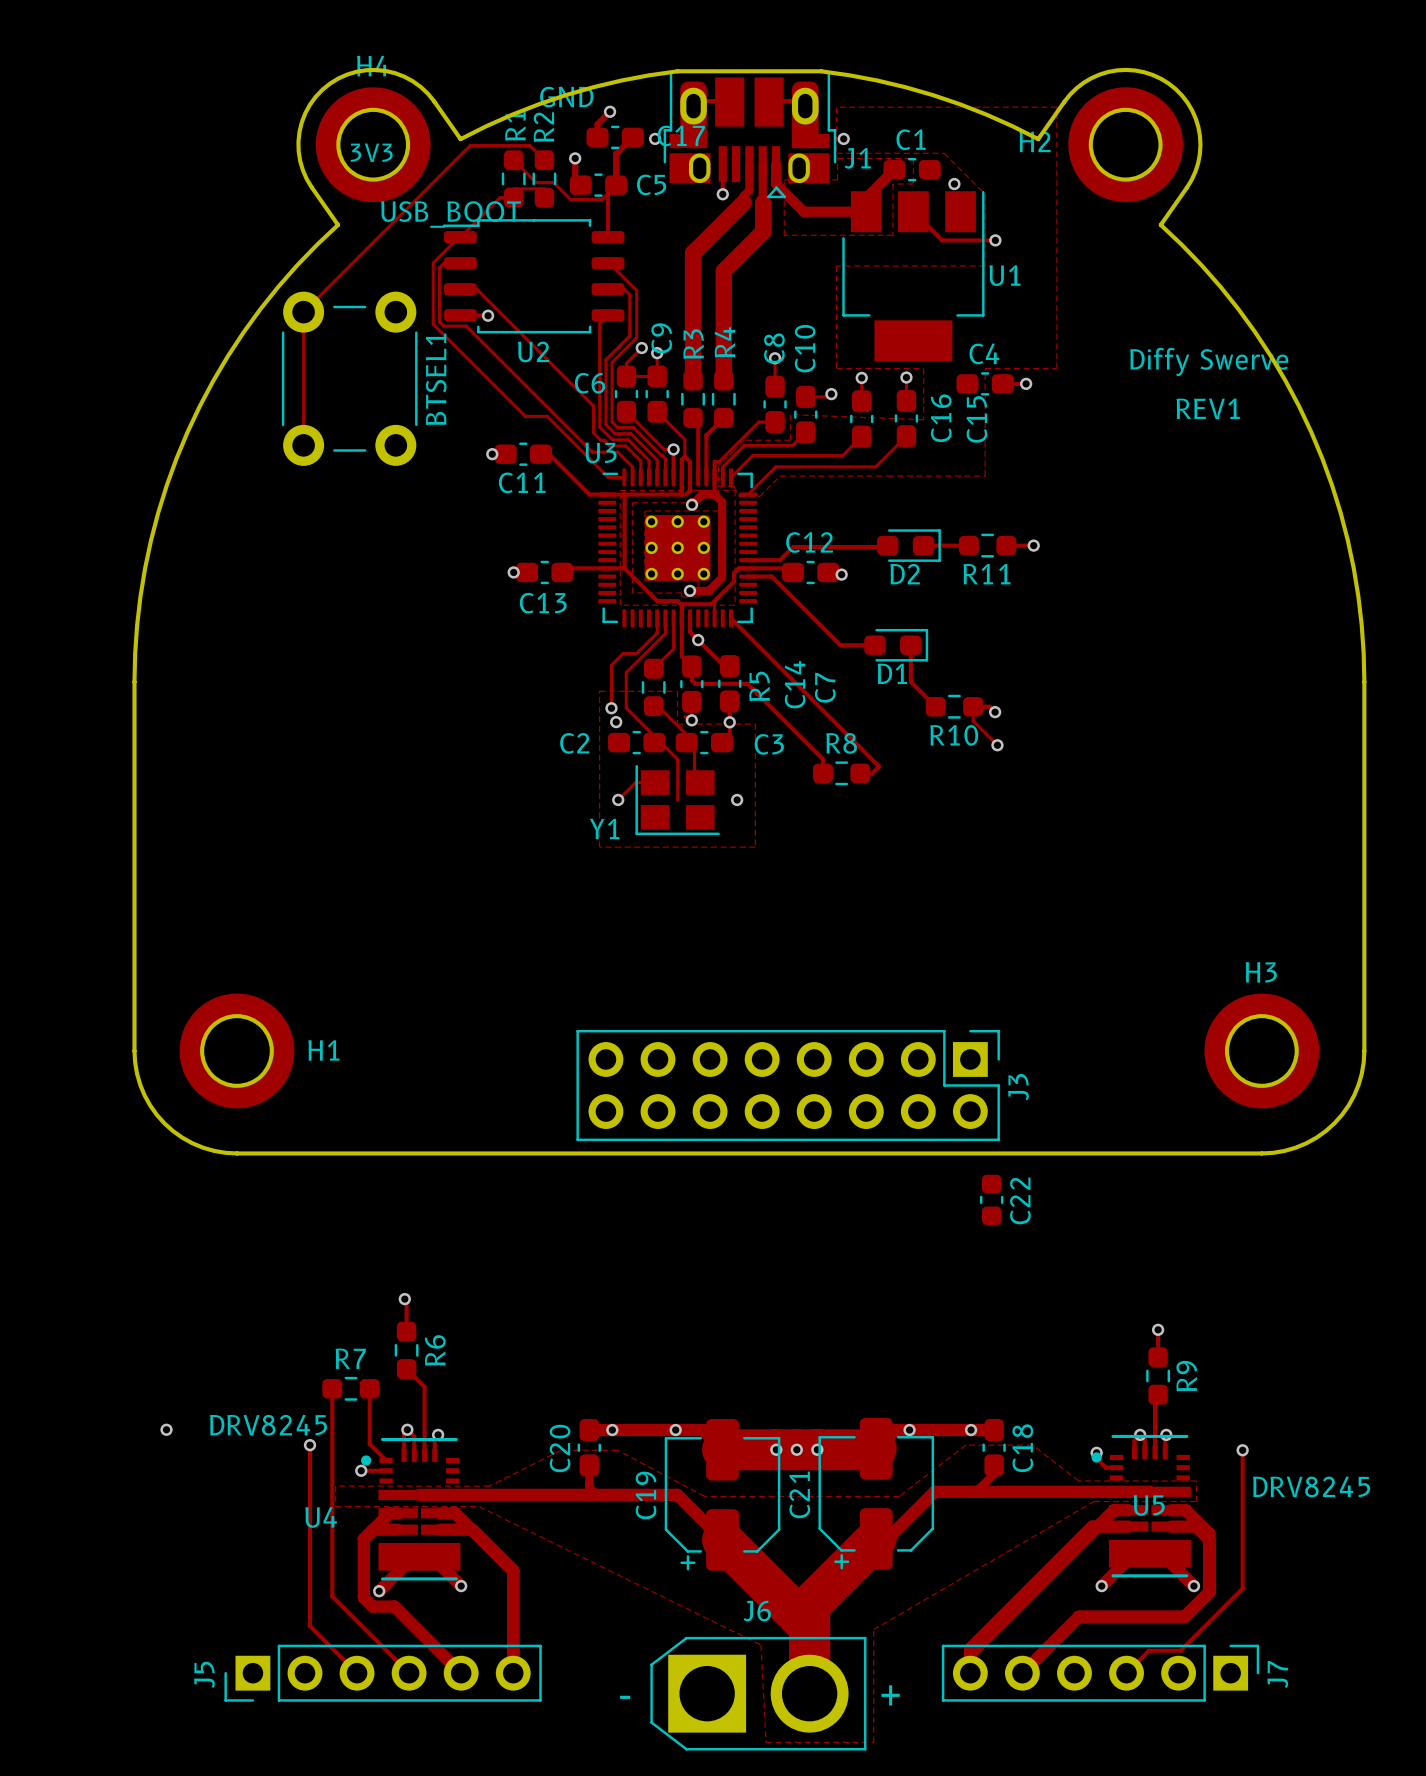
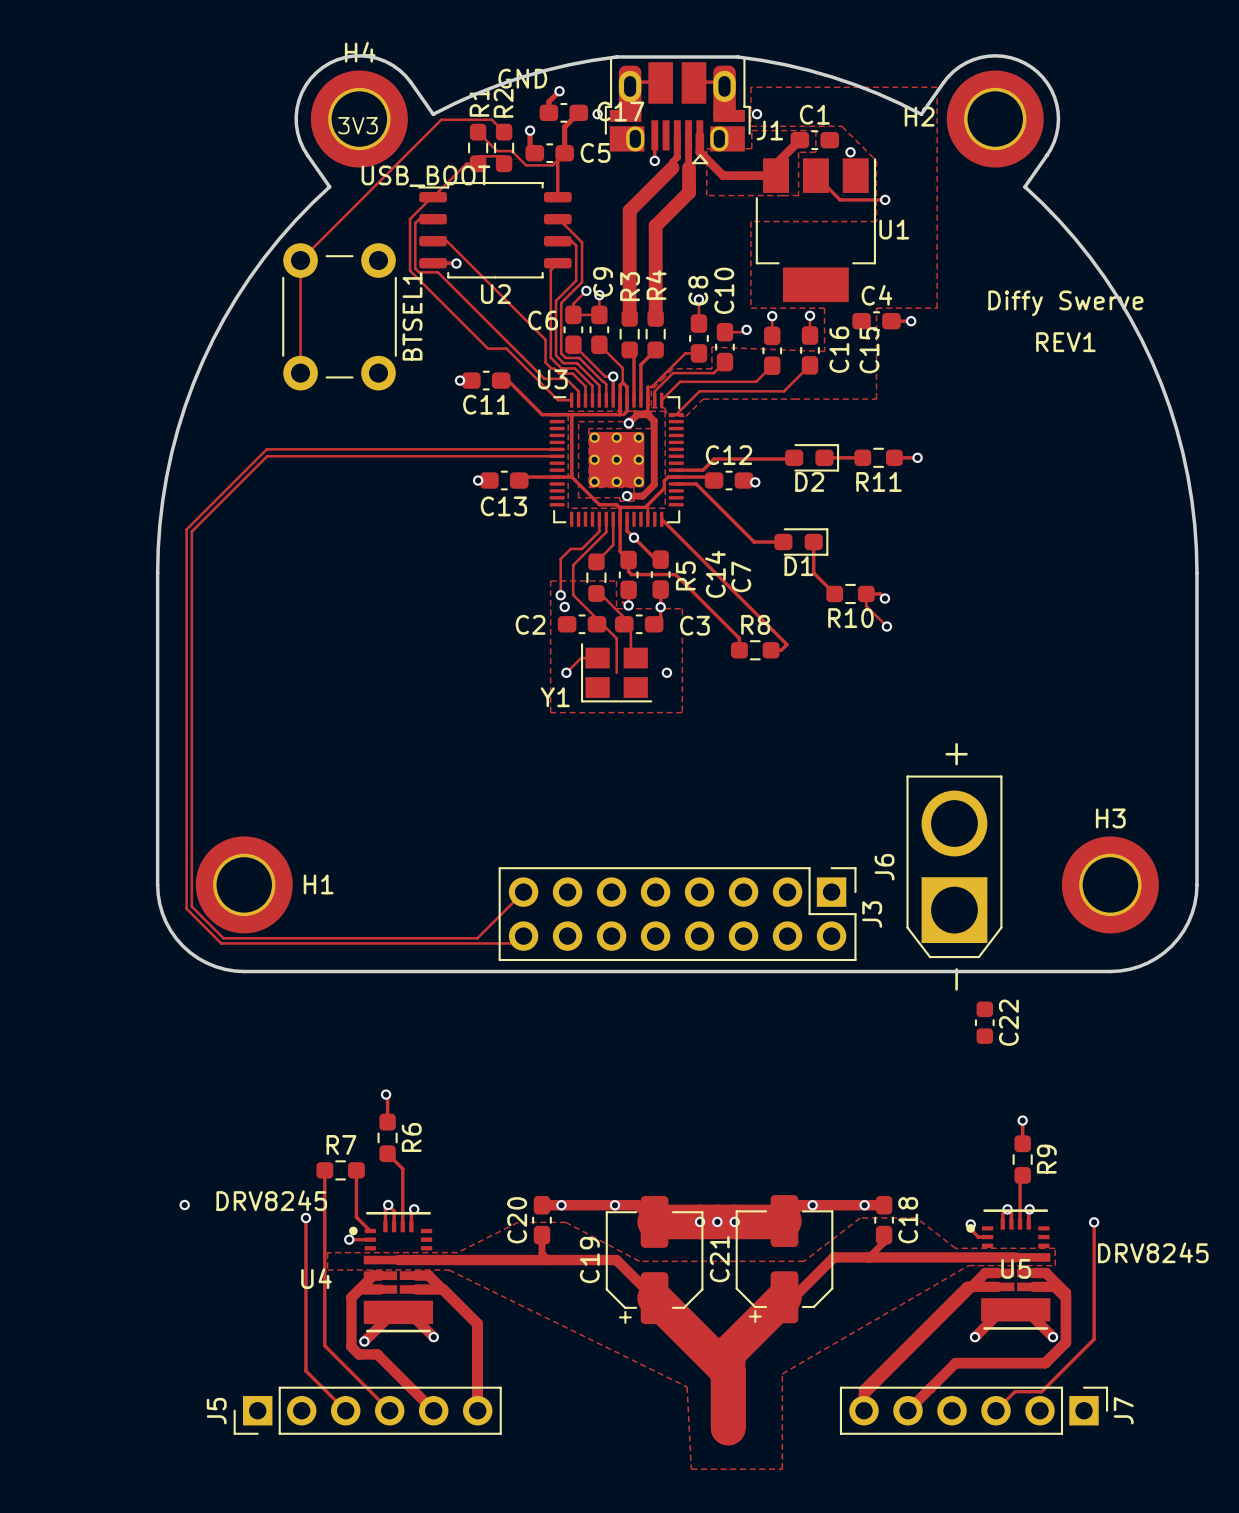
track: none -> (557, 449) (266, 449) (186, 529) (186, 908) (221, 943) (516, 943) (523, 936)
track: none -> (557, 456) (267, 456) (191, 531) (191, 906) (223, 938) (477, 938) (523, 892)
J3 position: (788, 1085) -> (677, 914)
C22 position: (991, 1199) -> (984, 1022)
J6 rotation: 0° (758, 1693) -> 90° counterclockwise (954, 866)
J6 position: (758, 1693) -> (954, 866)

